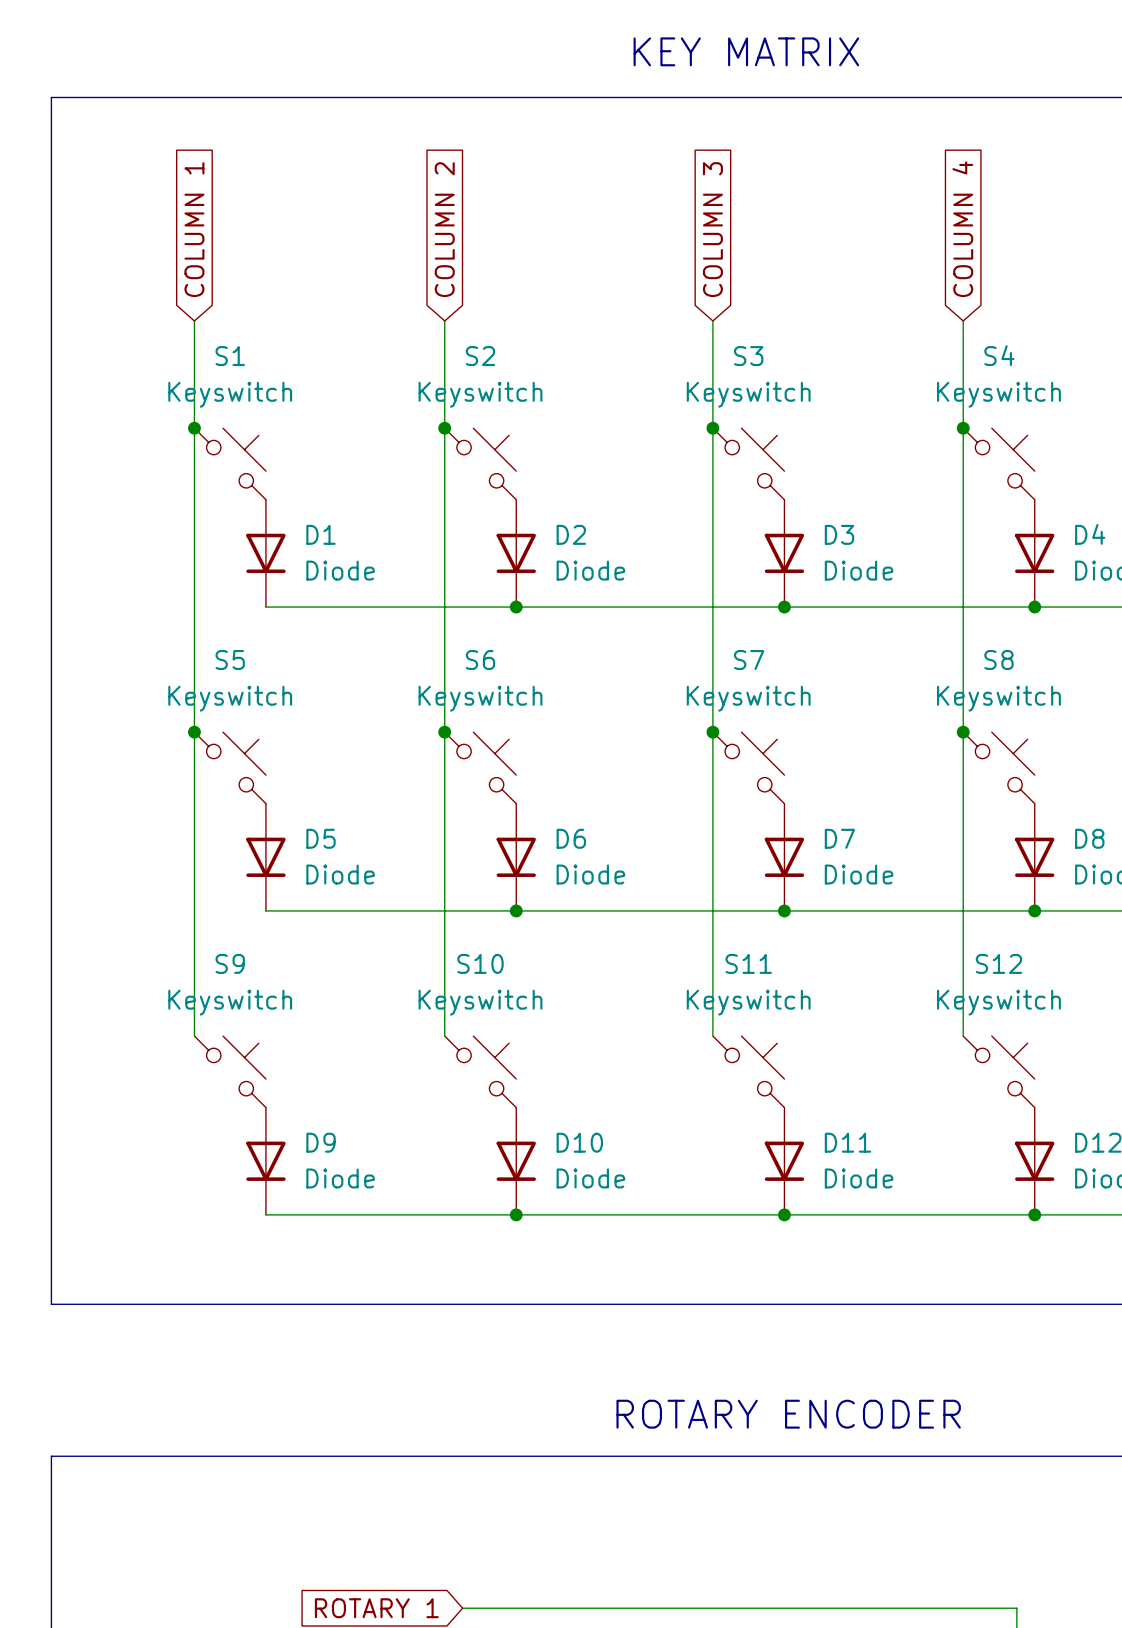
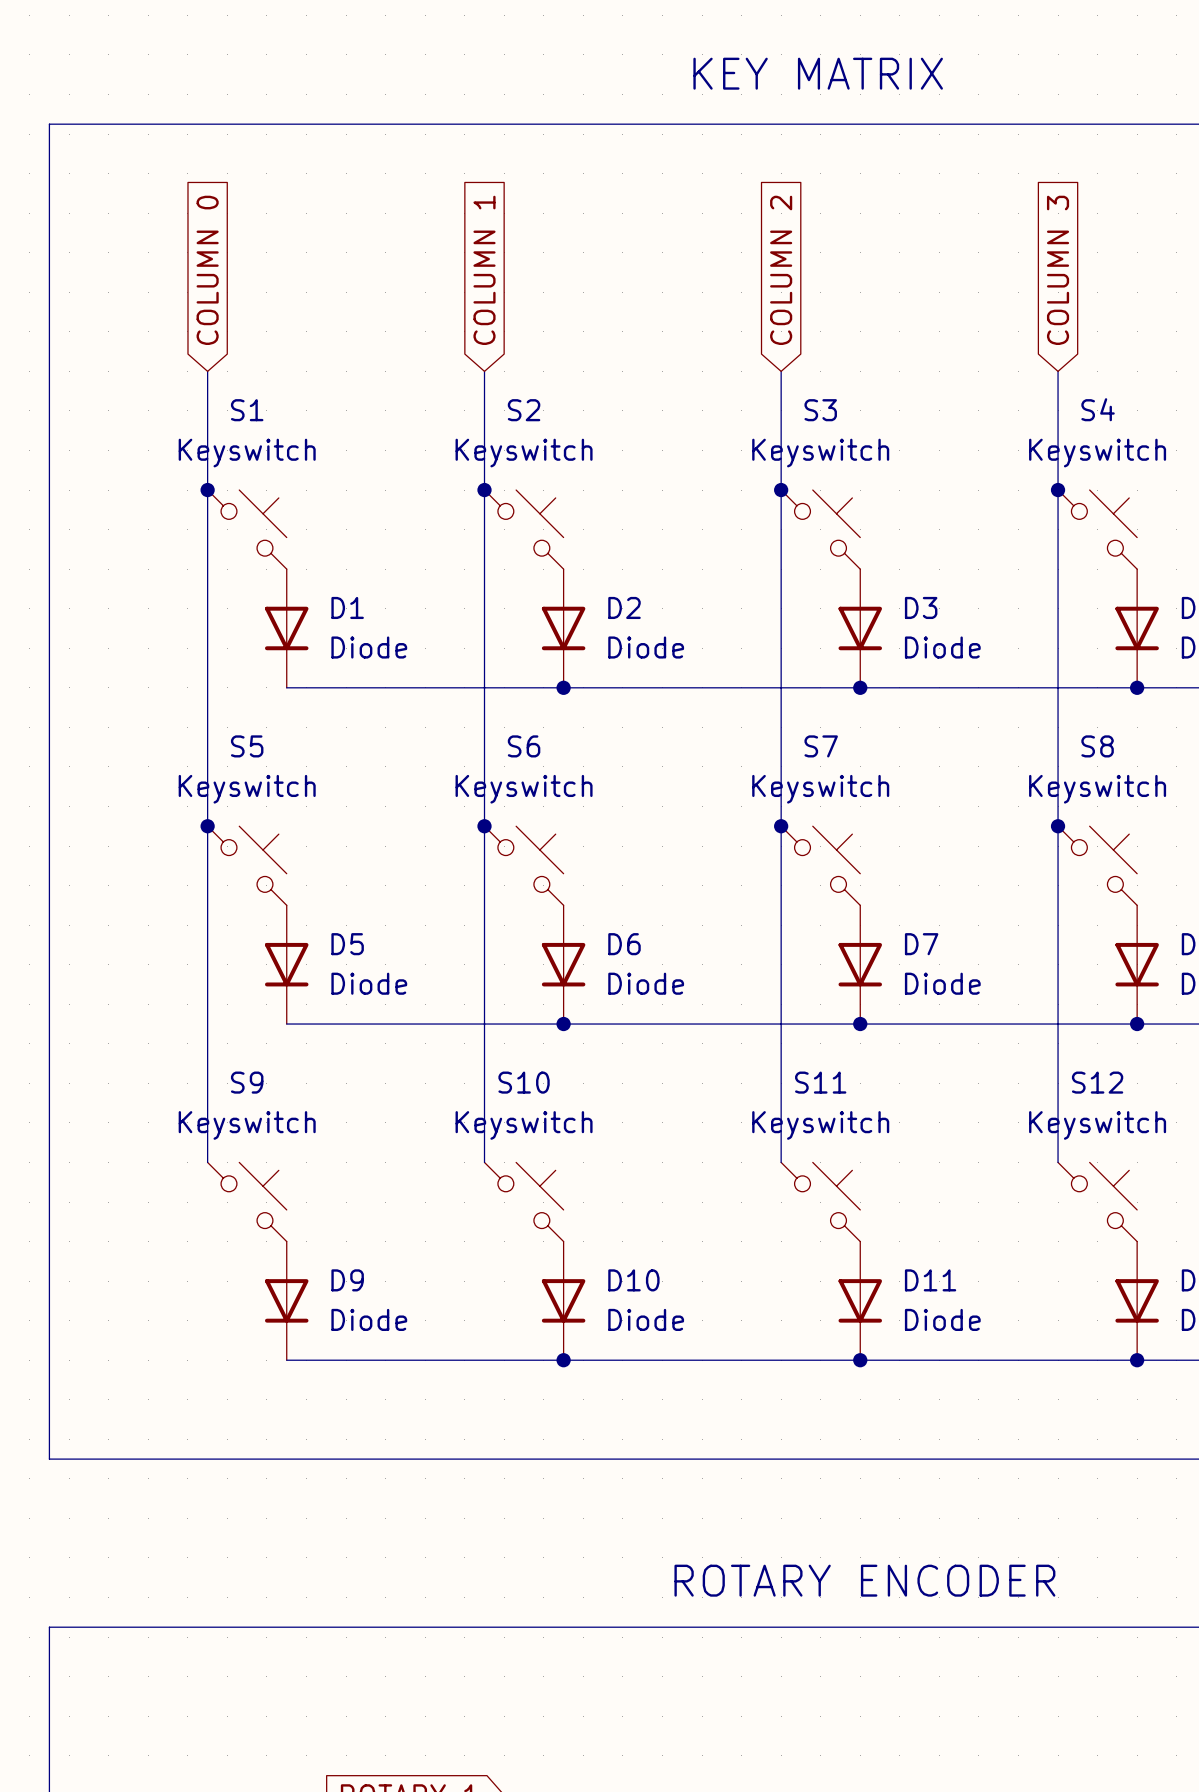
global label: COLUMN 1 (194, 229) -> COLUMN 0 (207, 270)
global label: COLUMN 2 (444, 229) -> COLUMN 1 (484, 270)
global label: COLUMN 3 (712, 229) -> COLUMN 2 (781, 270)
global label: COLUMN 4 (962, 229) -> COLUMN 3 (1058, 270)

